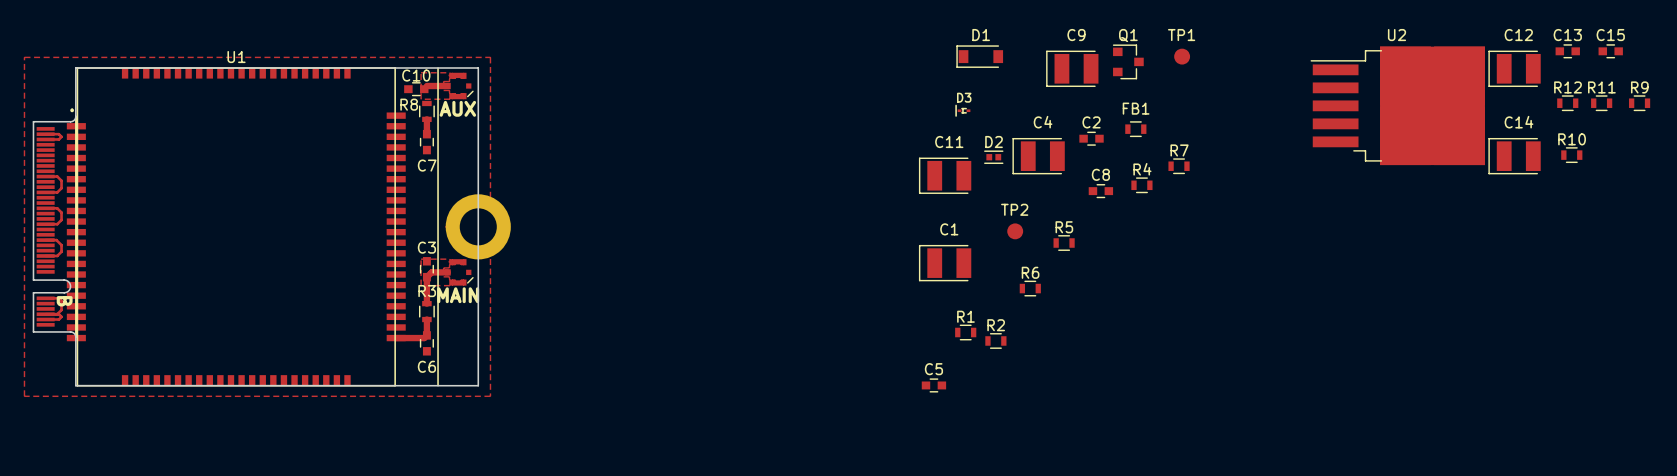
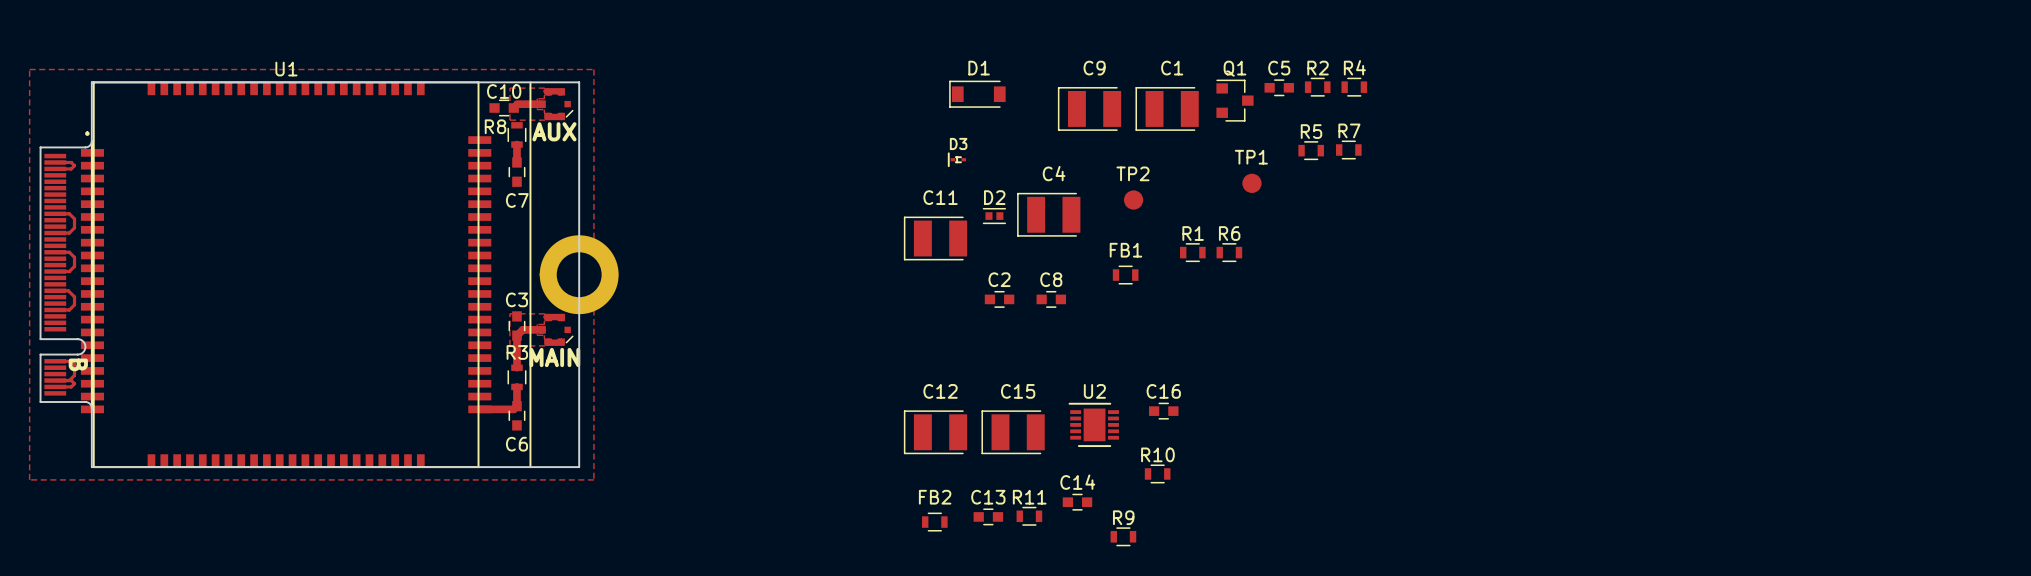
U2 name position: U2 (1397, 35) -> U2 (1094, 391)
C15 footprint: [1598, 44, 1623, 59] -> [981, 410, 1045, 455]
U2 footprint: [1310, 46, 1485, 166] -> [1068, 402, 1119, 448]
C13 position: (1567, 51) -> (988, 516)
D1 position: (979, 56) -> (977, 94)
TP1 position: (1182, 56) -> (1251, 183)
Q1 position: (1128, 61) -> (1234, 100)
C9 position: (1072, 68) -> (1089, 108)
C12 position: (1514, 68) -> (935, 432)
R12: (1567, 103) -> none
R11 position: (1601, 103) -> (1029, 516)
R9 position: (1639, 103) -> (1123, 536)
D3 position: (962, 110) -> (956, 159)
FB1 position: (1135, 129) -> (1125, 275)
C2 position: (1091, 138) -> (999, 299)
C14 footprint: [1488, 138, 1541, 175] -> [1062, 493, 1093, 511]
R10 position: (1571, 155) -> (1157, 473)
C4 position: (1038, 156) -> (1048, 214)
D2 position: (993, 157) -> (994, 216)
R7 position: (1179, 166) -> (1348, 150)
C11 position: (945, 175) -> (935, 238)
R4 position: (1141, 185) -> (1354, 87)
C8 position: (1100, 191) -> (1051, 299)
TP2 position: (1015, 231) -> (1133, 200)
R5 position: (1064, 243) -> (1311, 150)
C1 position: (945, 263) -> (1167, 108)
R6 position: (1030, 288) -> (1229, 252)
R1 position: (965, 332) -> (1192, 252)
C16: none -> (1163, 411)
R2 position: (995, 340) -> (1317, 87)
C5 position: (933, 385) -> (1279, 87)
FB2: none -> (934, 522)

